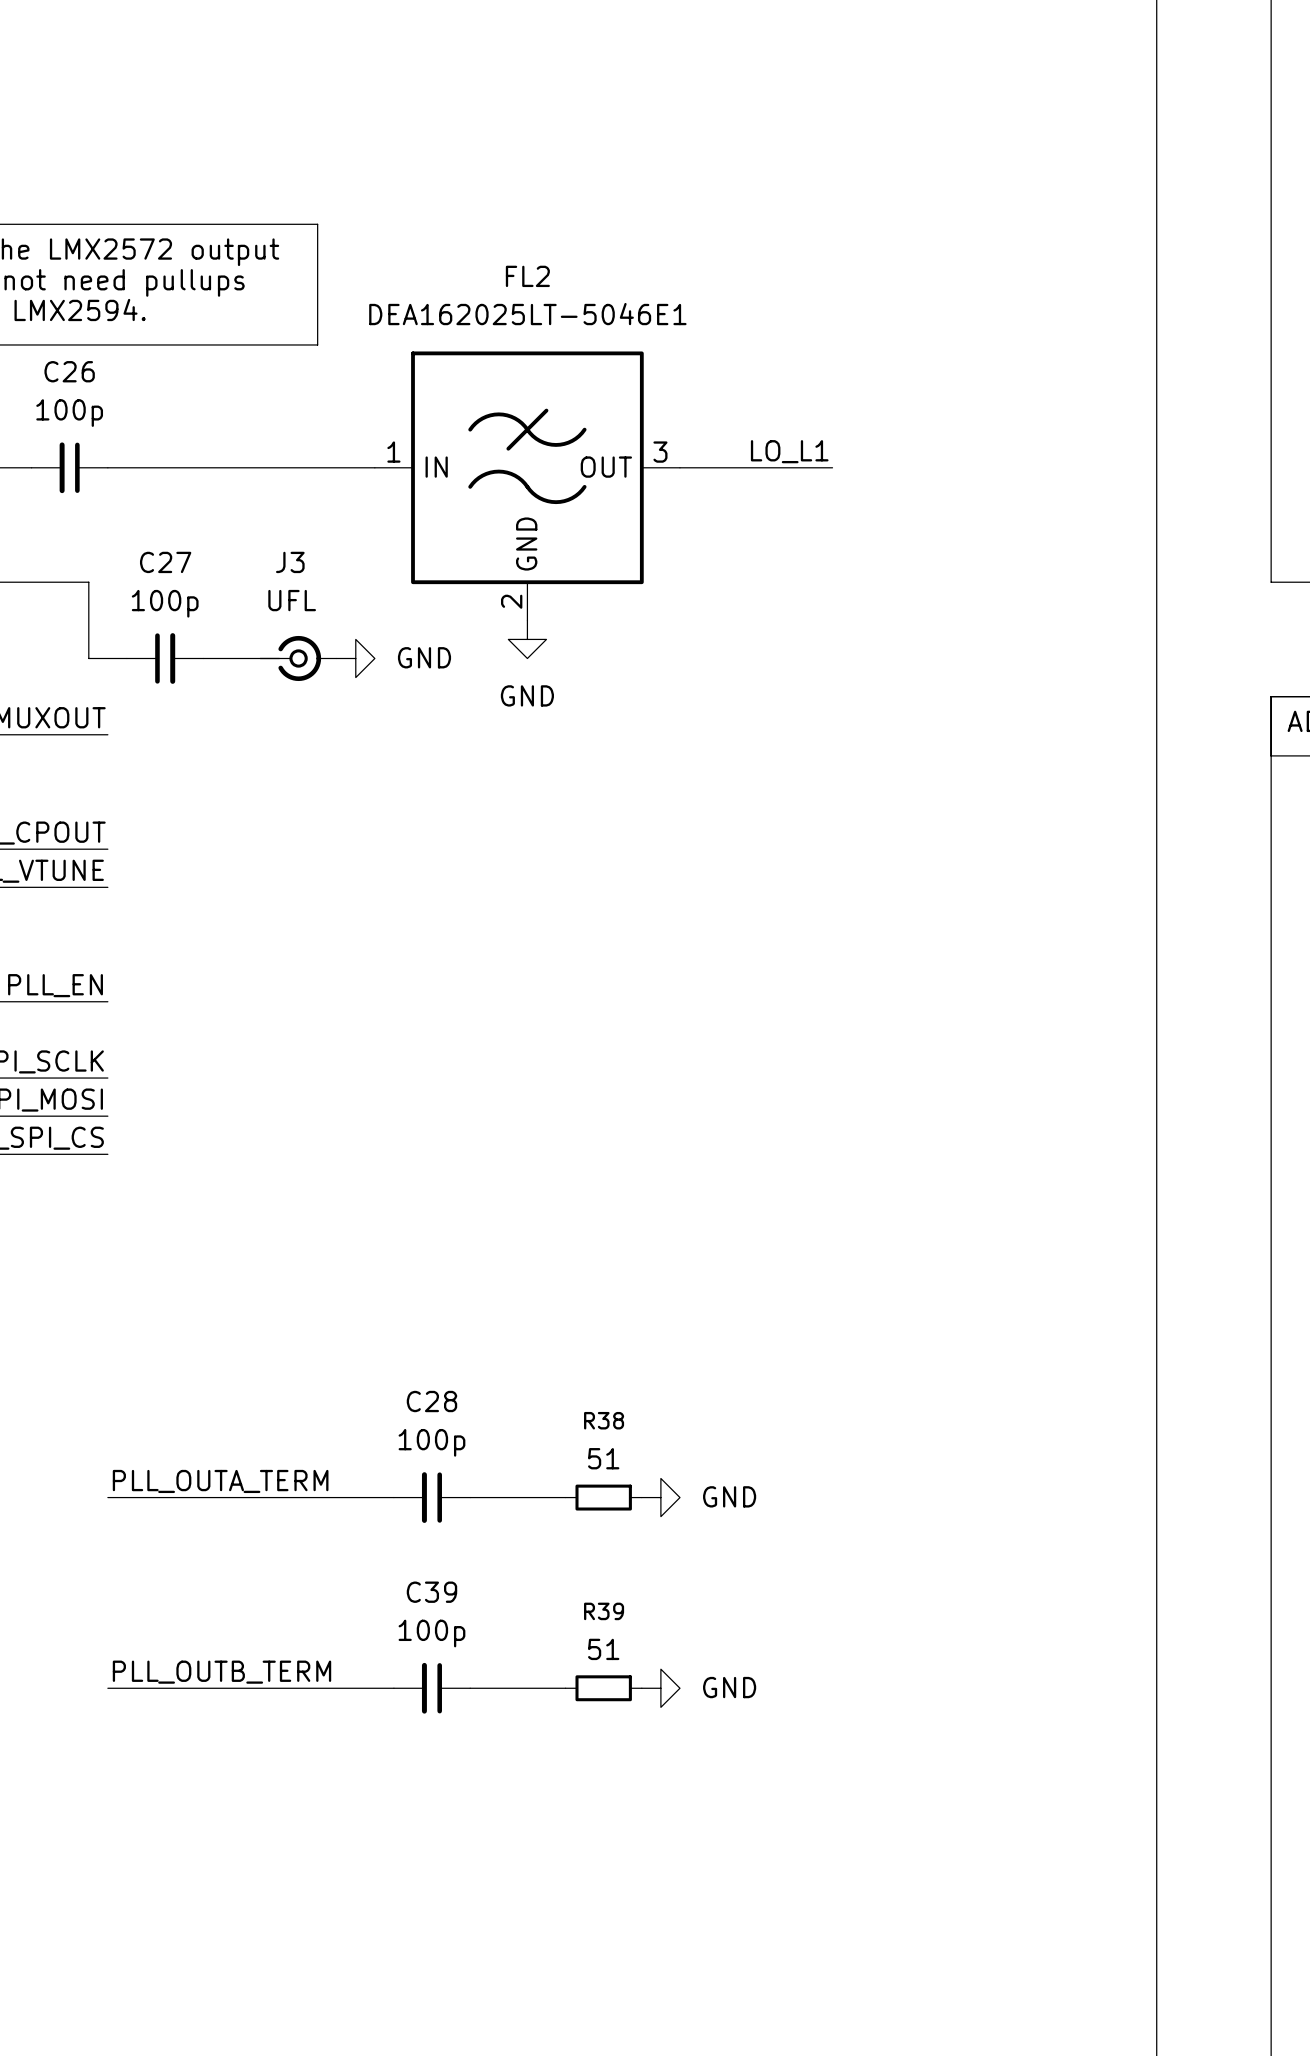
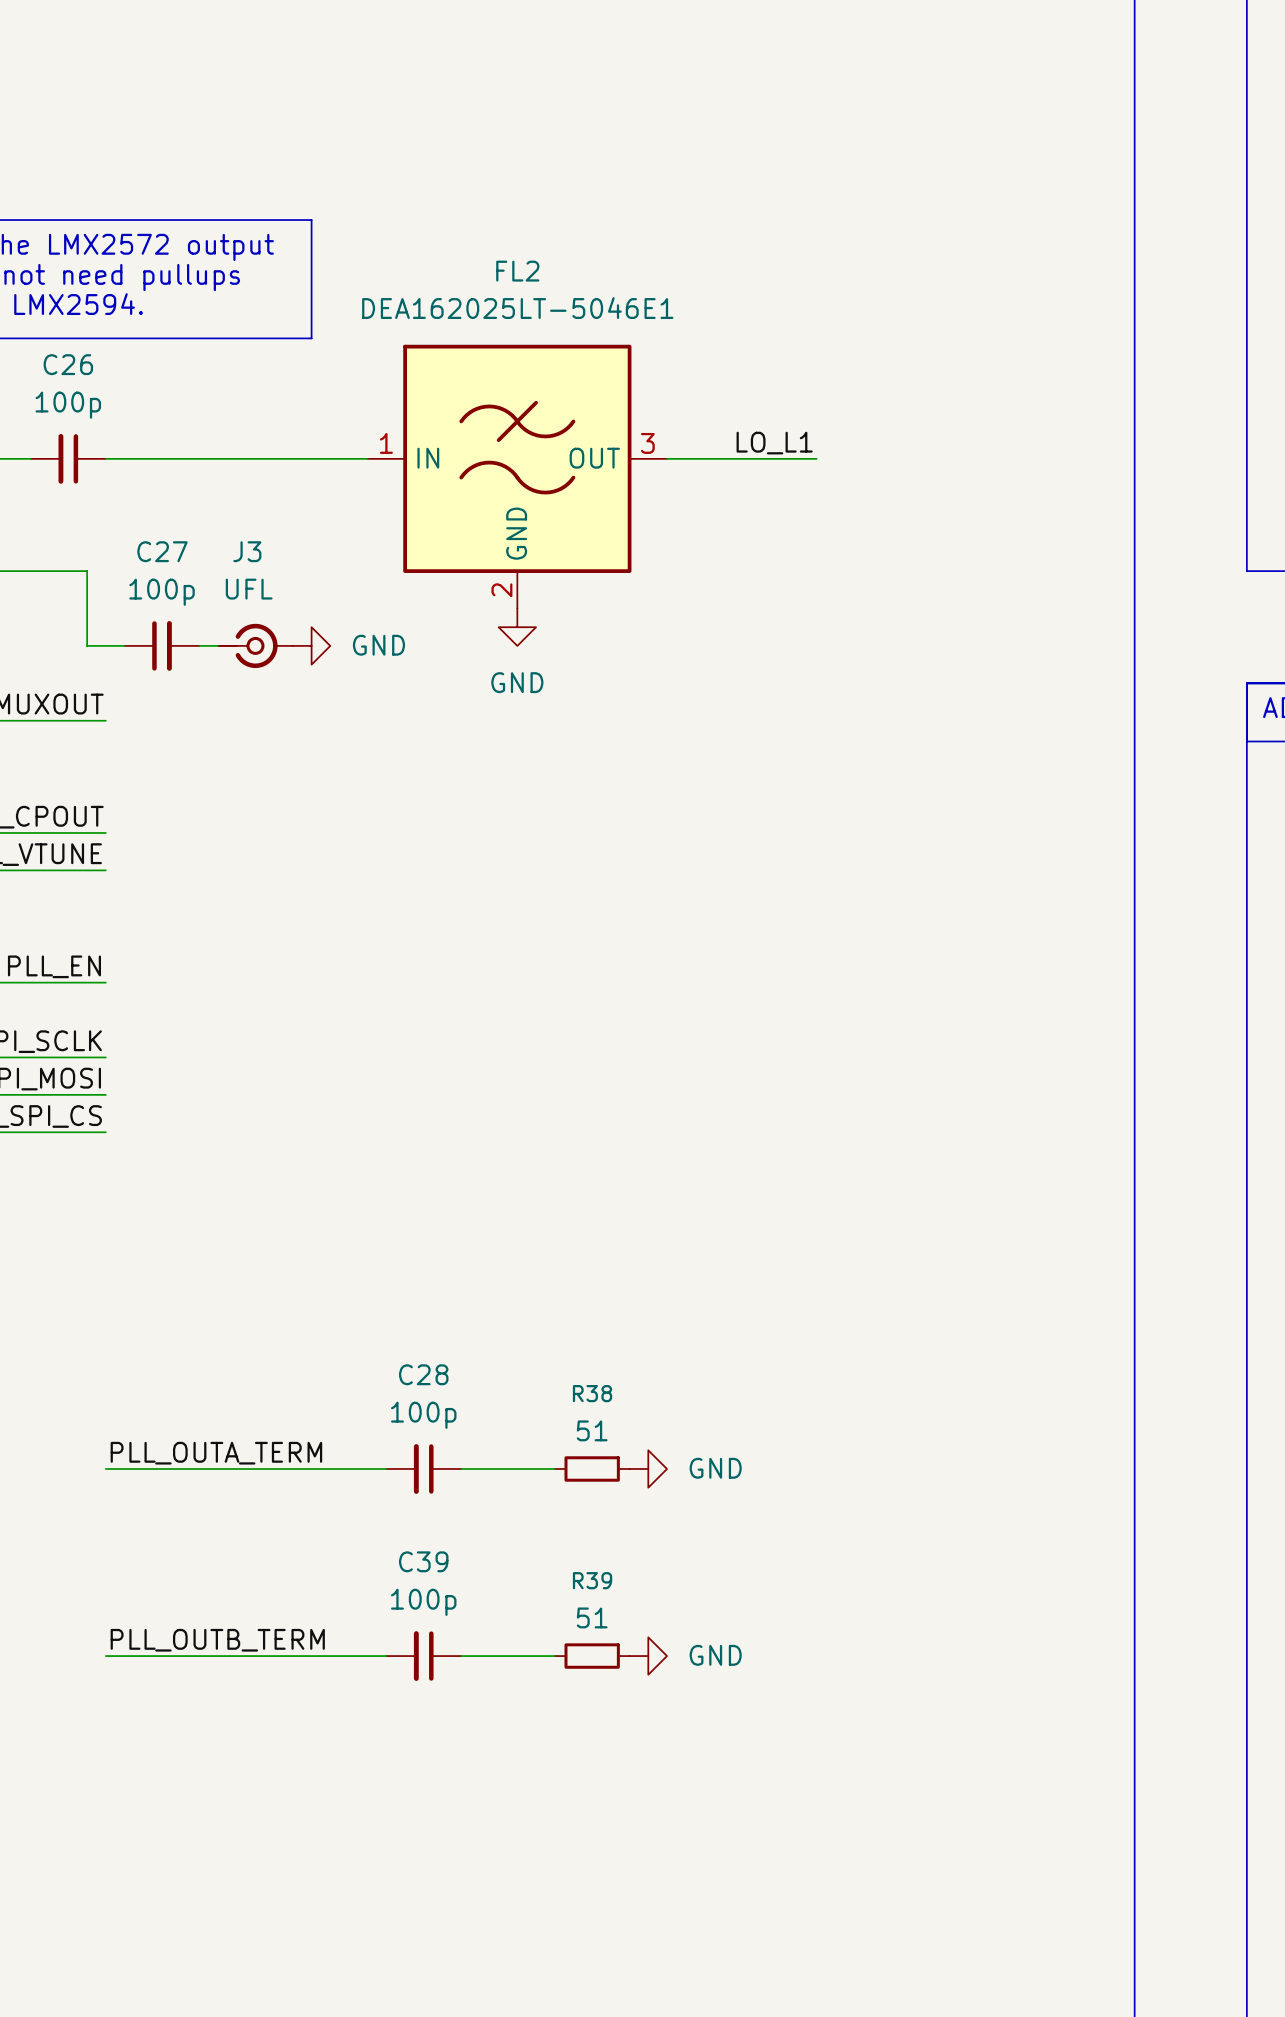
J3 position: (298, 658) -> (255, 645)
power symbol position: GND (355, 658) -> GND (311, 645)

